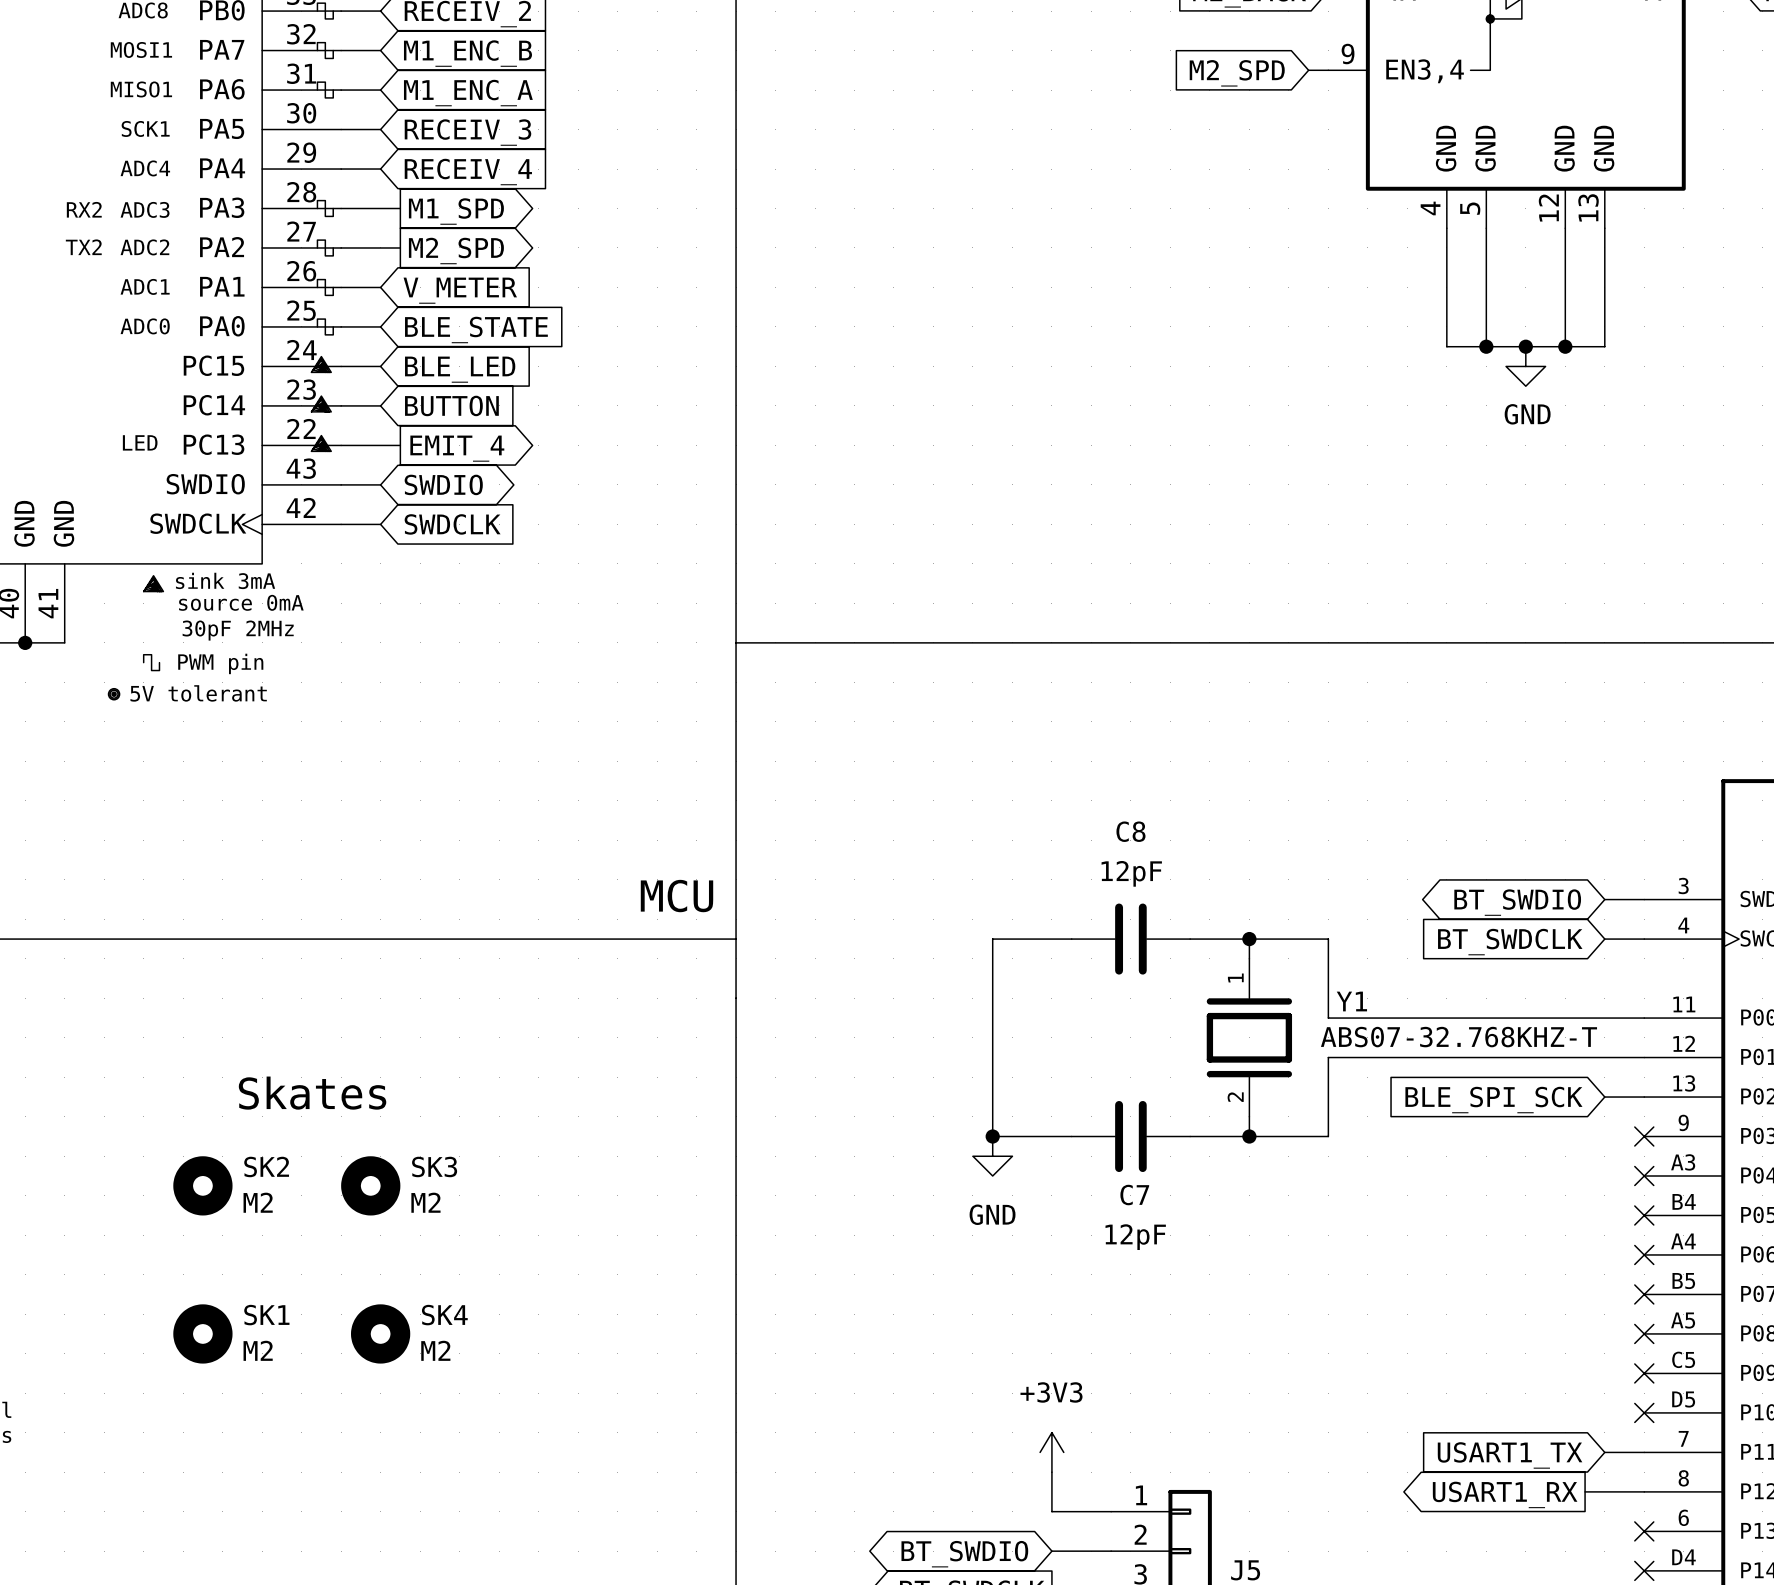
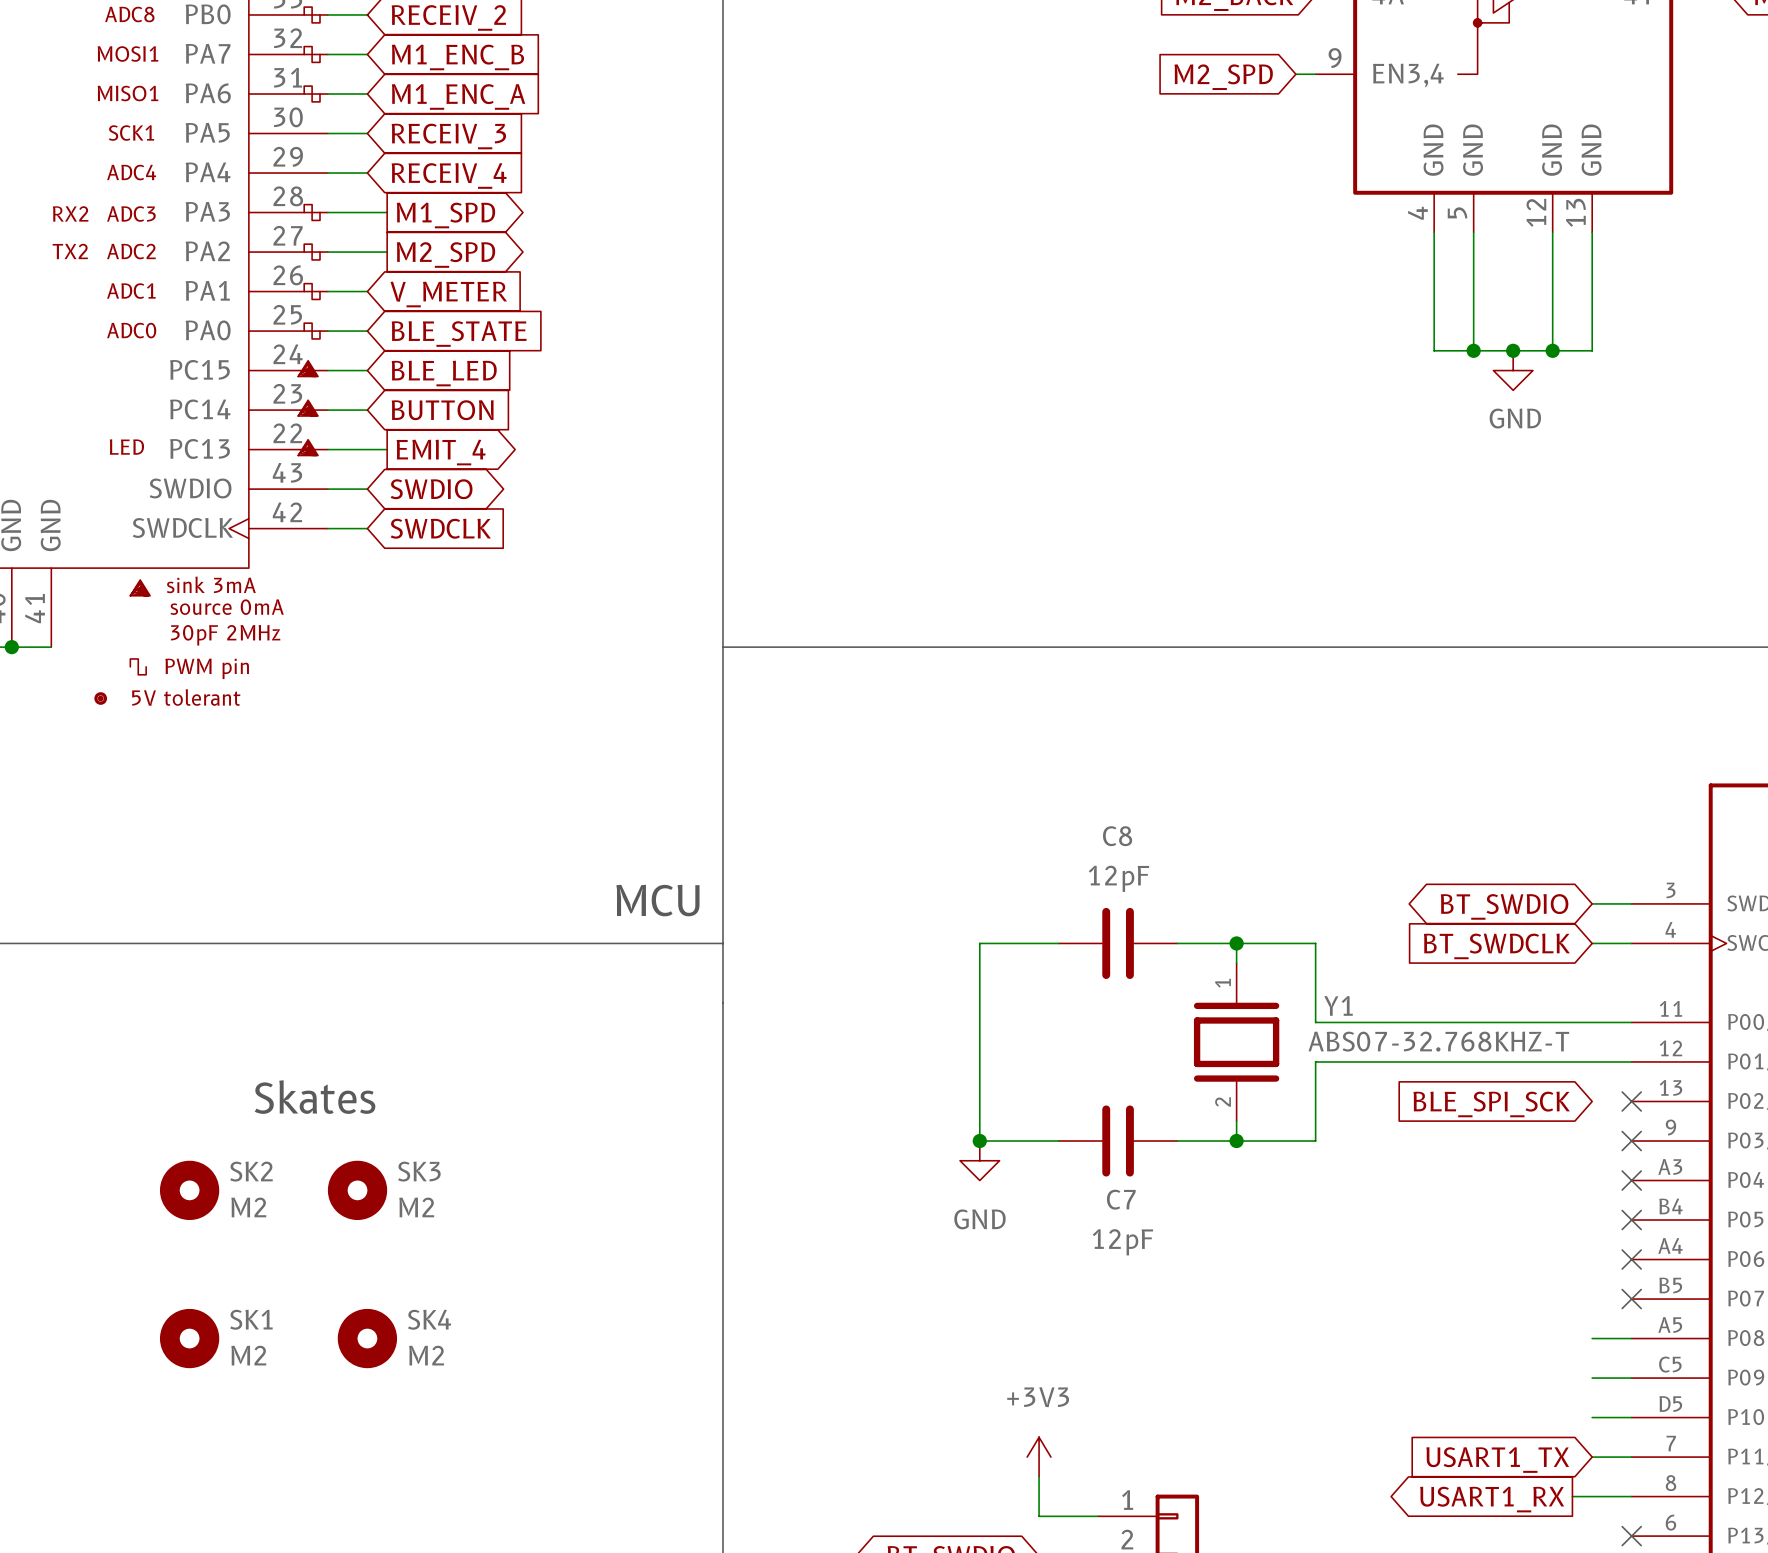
wire: (1604, 1097) (1644, 1097) -> (1592, 1338) (1631, 1338)
no-connect mark: none -> (1631, 1101)
no-connect mark: (1644, 1333) -> none
wire: none -> (1592, 1378) (1631, 1378)
no-connect mark: (1644, 1373) -> none
wire: none -> (1592, 1417) (1631, 1417)
no-connect mark: (1644, 1412) -> none

